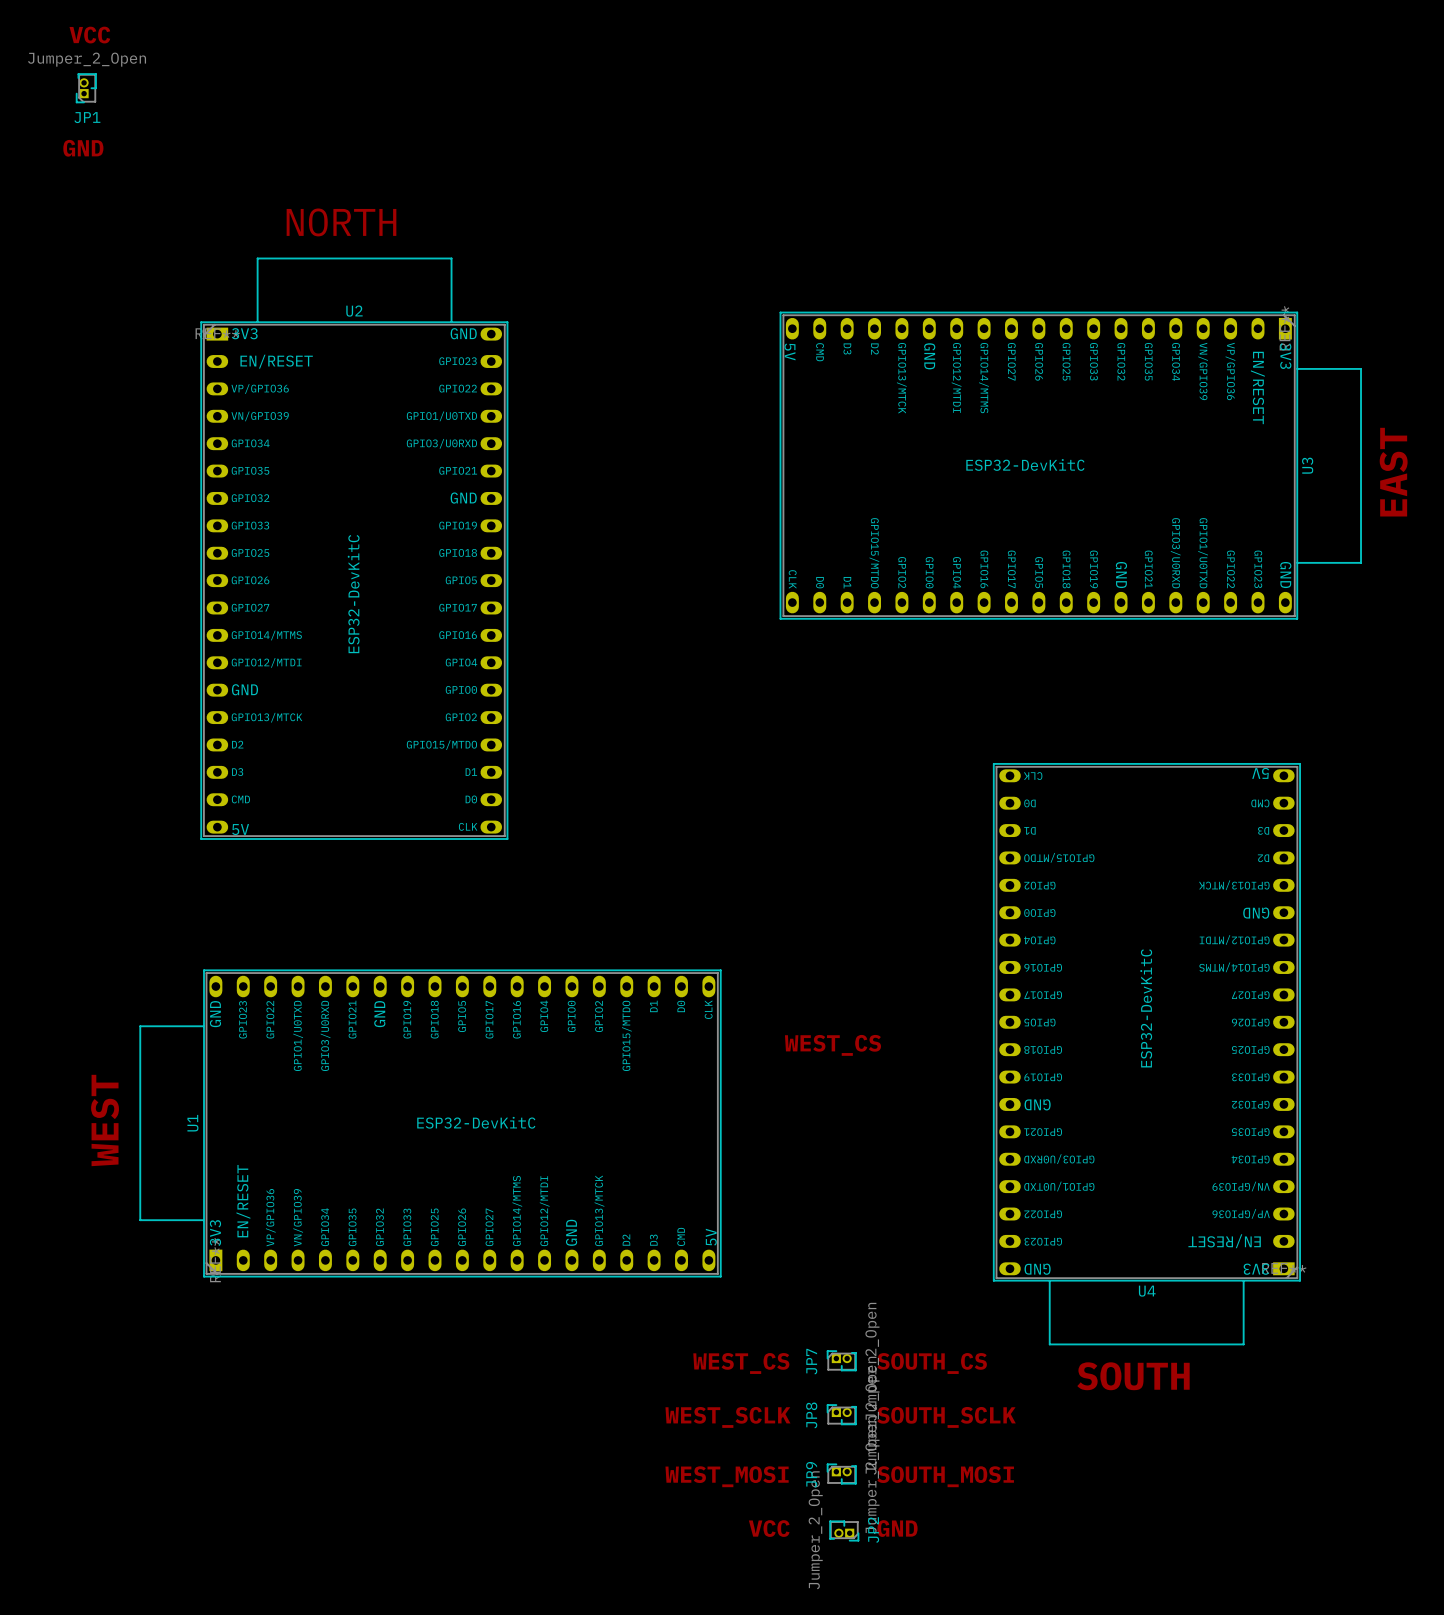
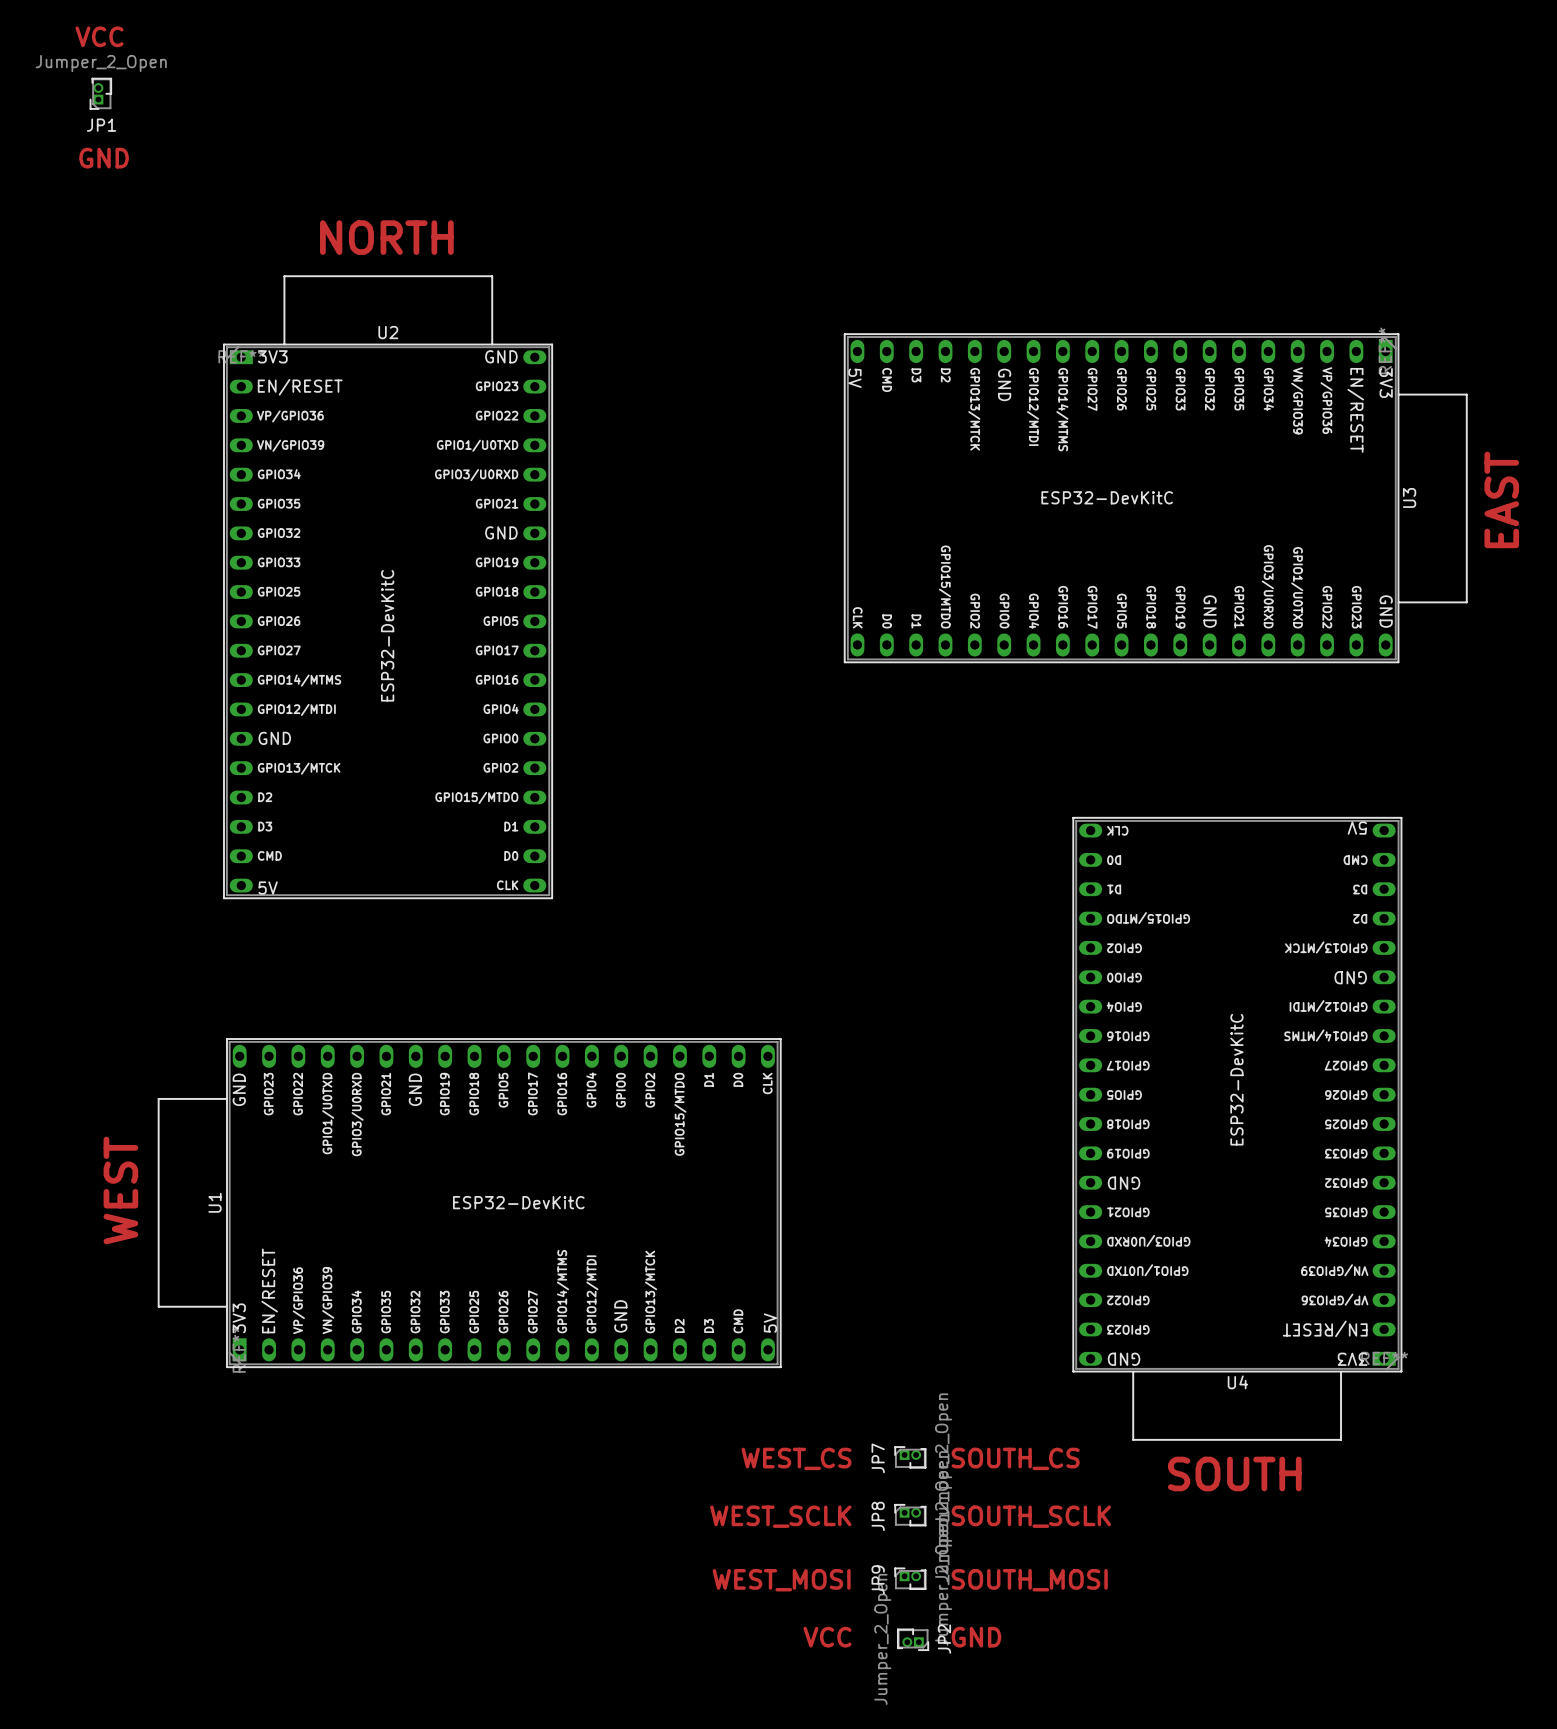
text: WEST_CS (832, 1045) -> none

